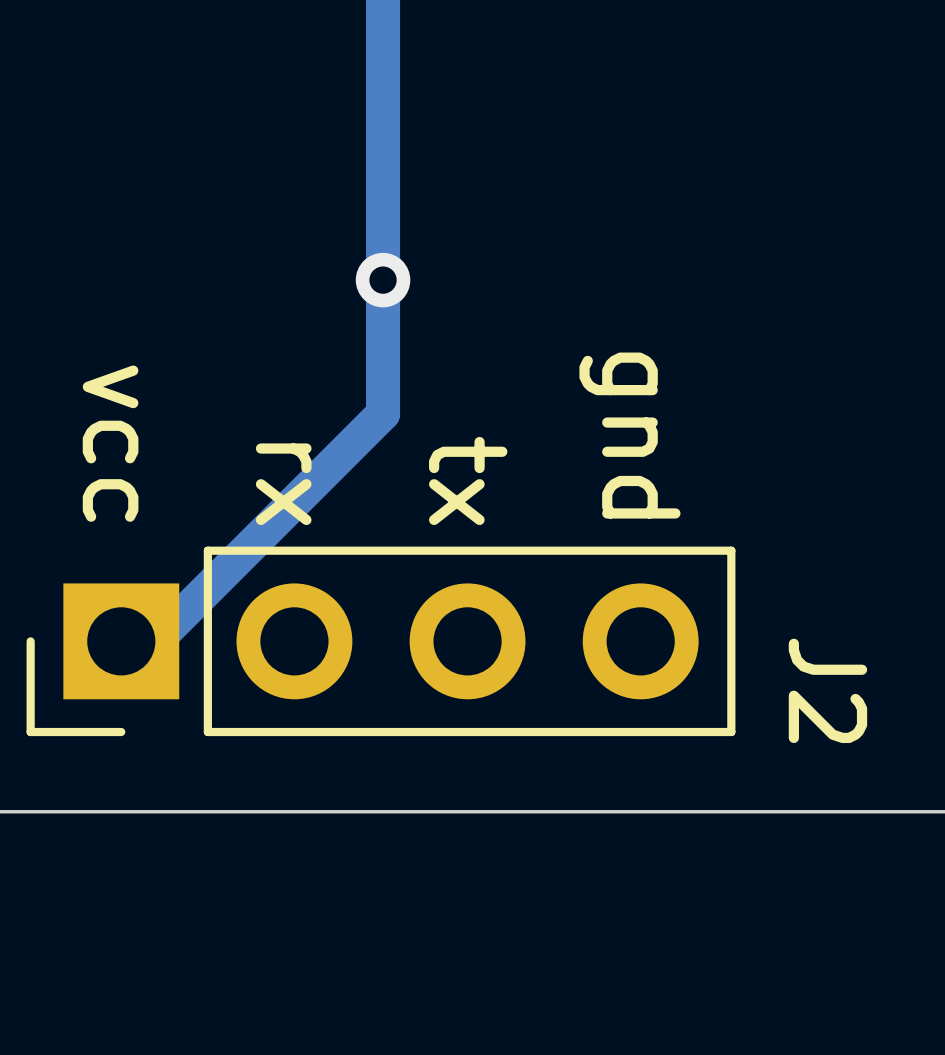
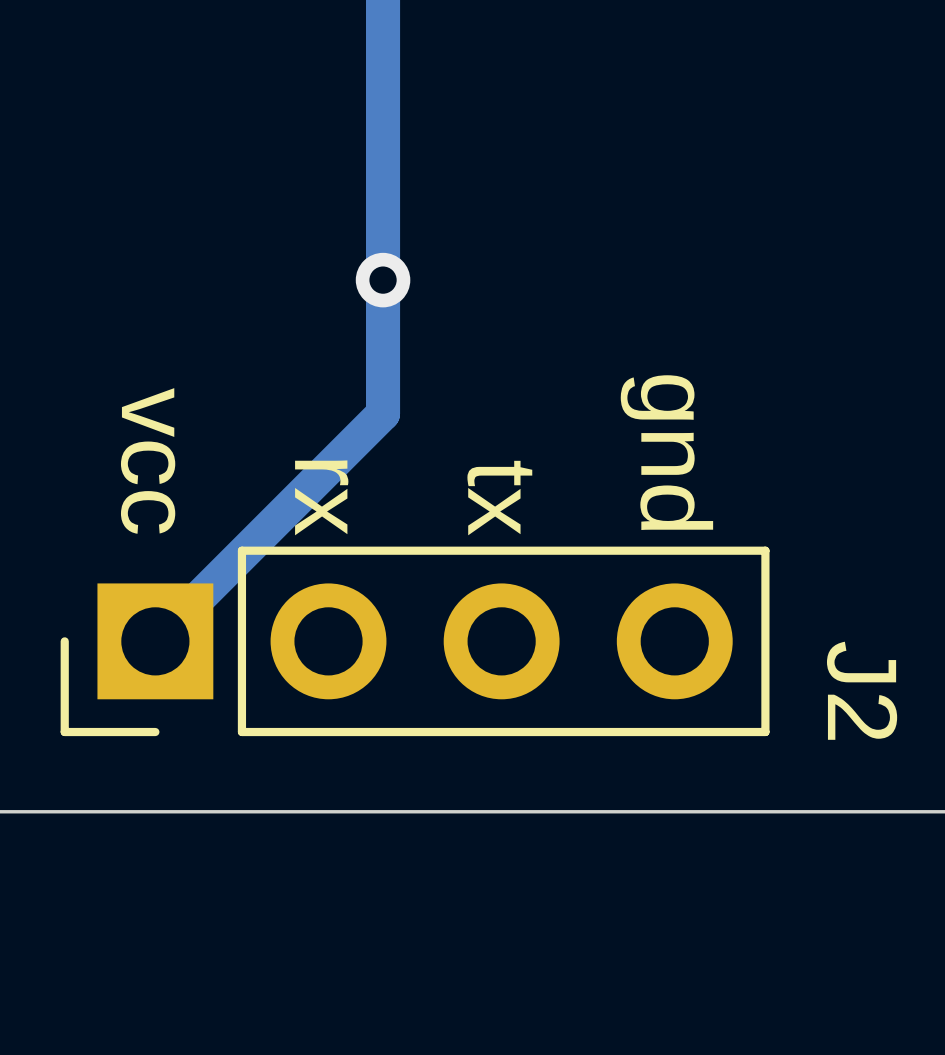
text position: gnd (629, 435) -> gnd (666, 452)
text position: vcc (110, 443) -> vcc (148, 460)
text position: tx (468, 480) -> tx (499, 498)
text position: rx (283, 484) -> rx (321, 497)
J2 position: (381, 641) -> (415, 641)

